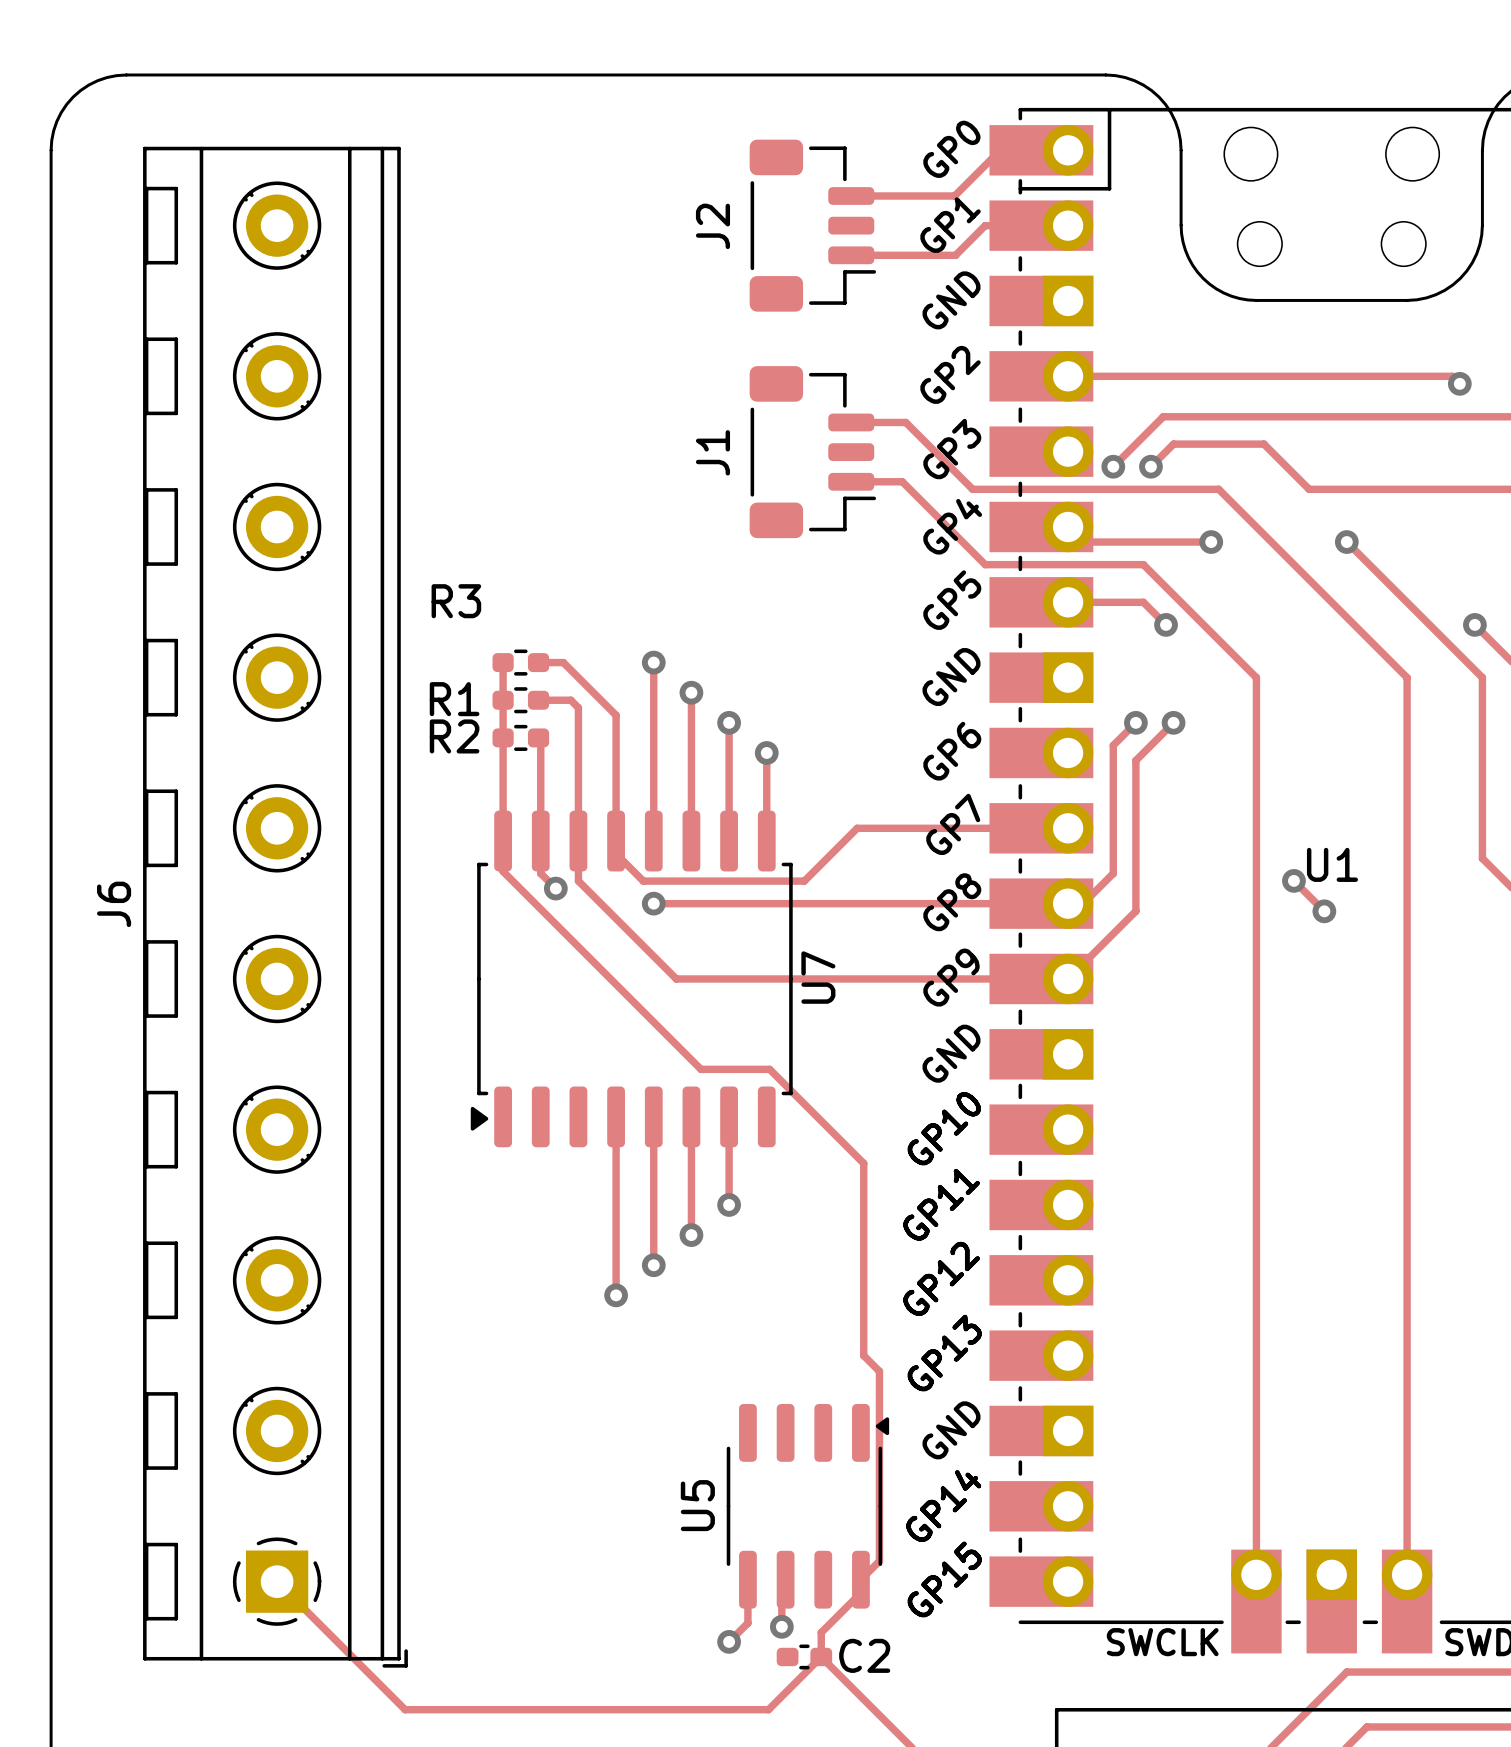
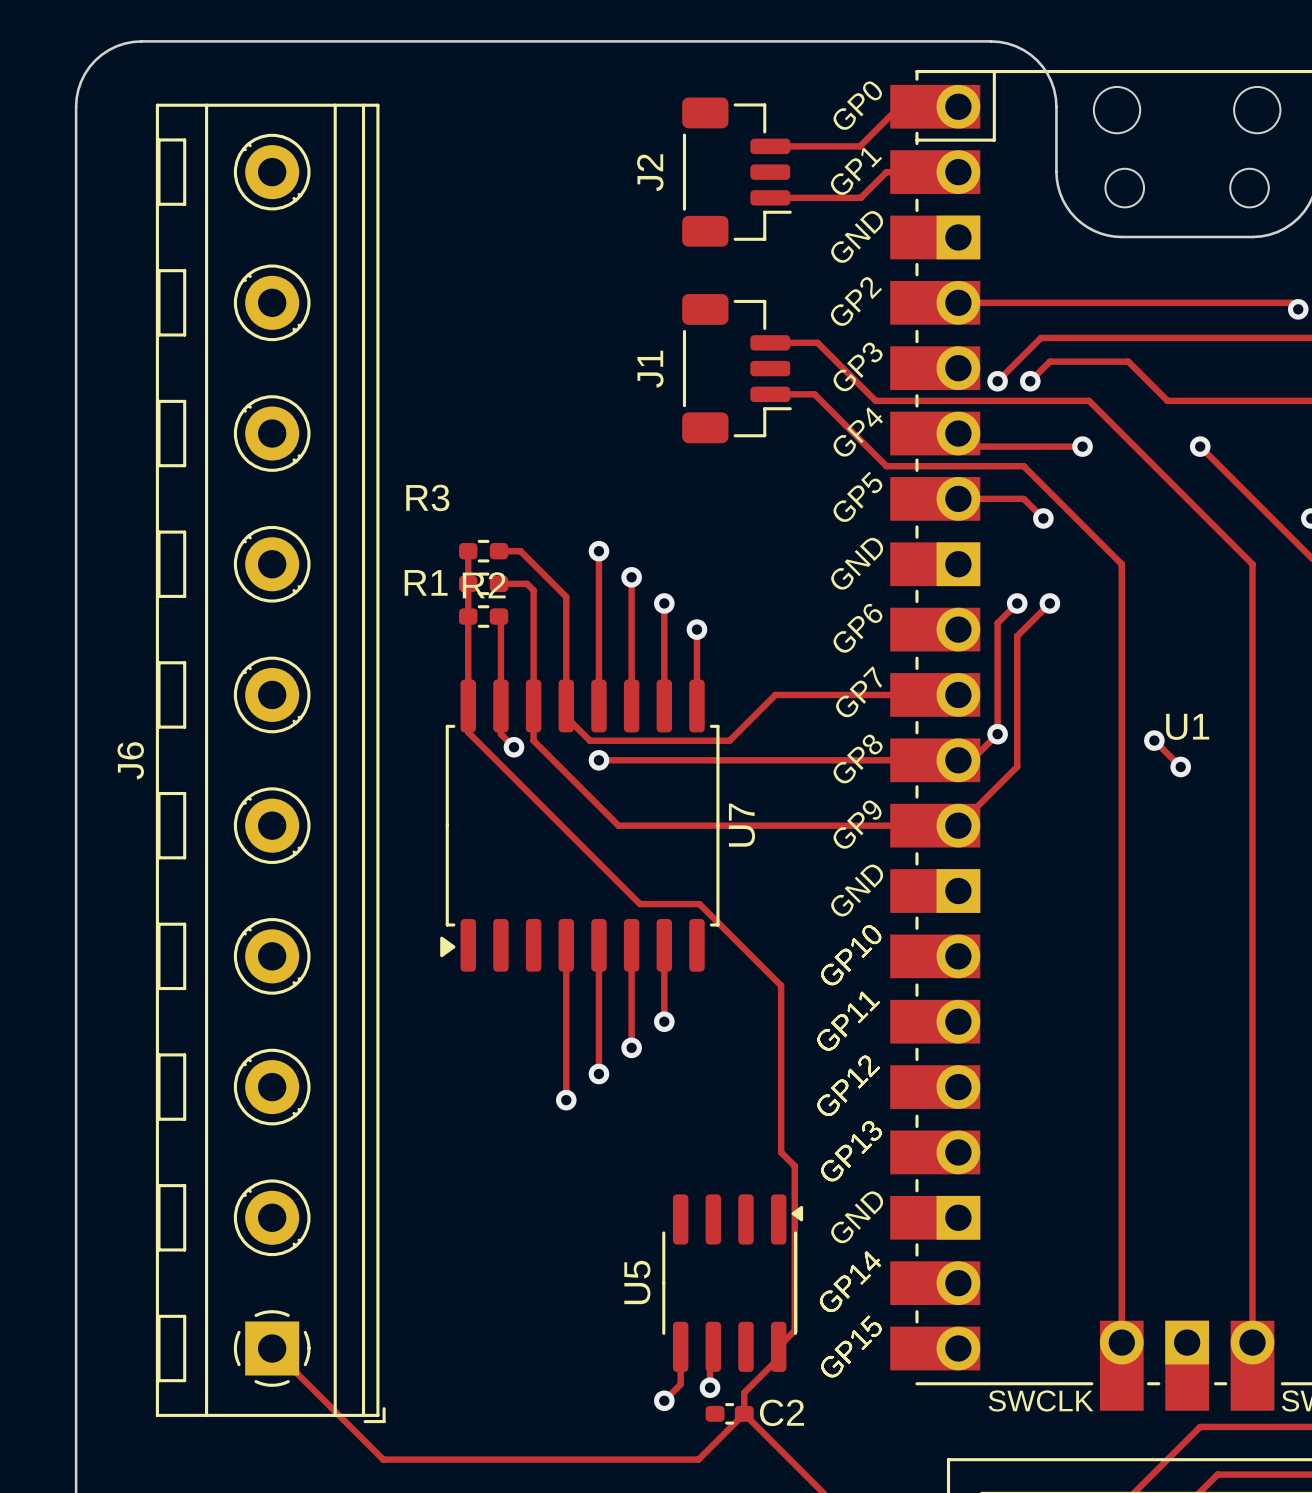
R2 name position: R2 (454, 736) -> R2 (484, 585)
via: none -> (997, 734)

